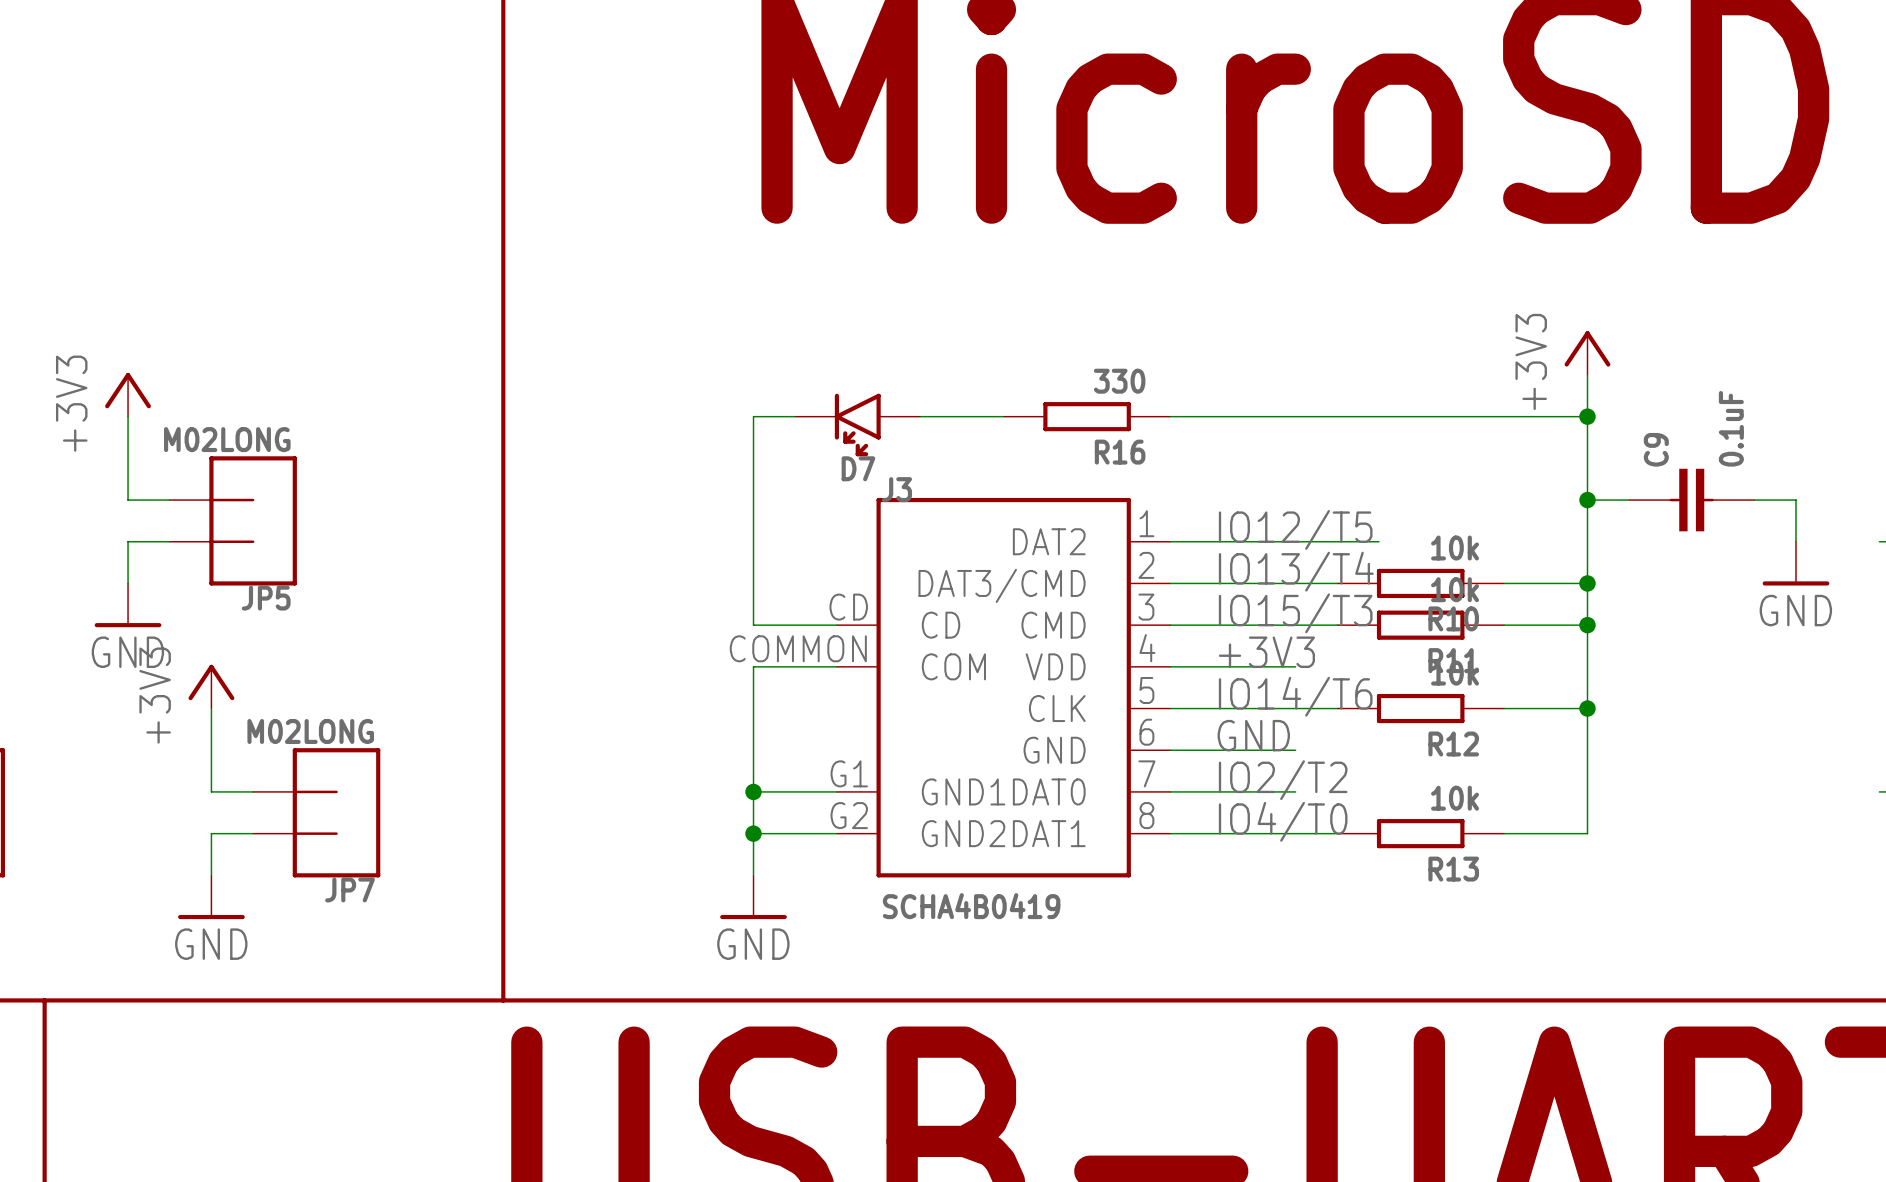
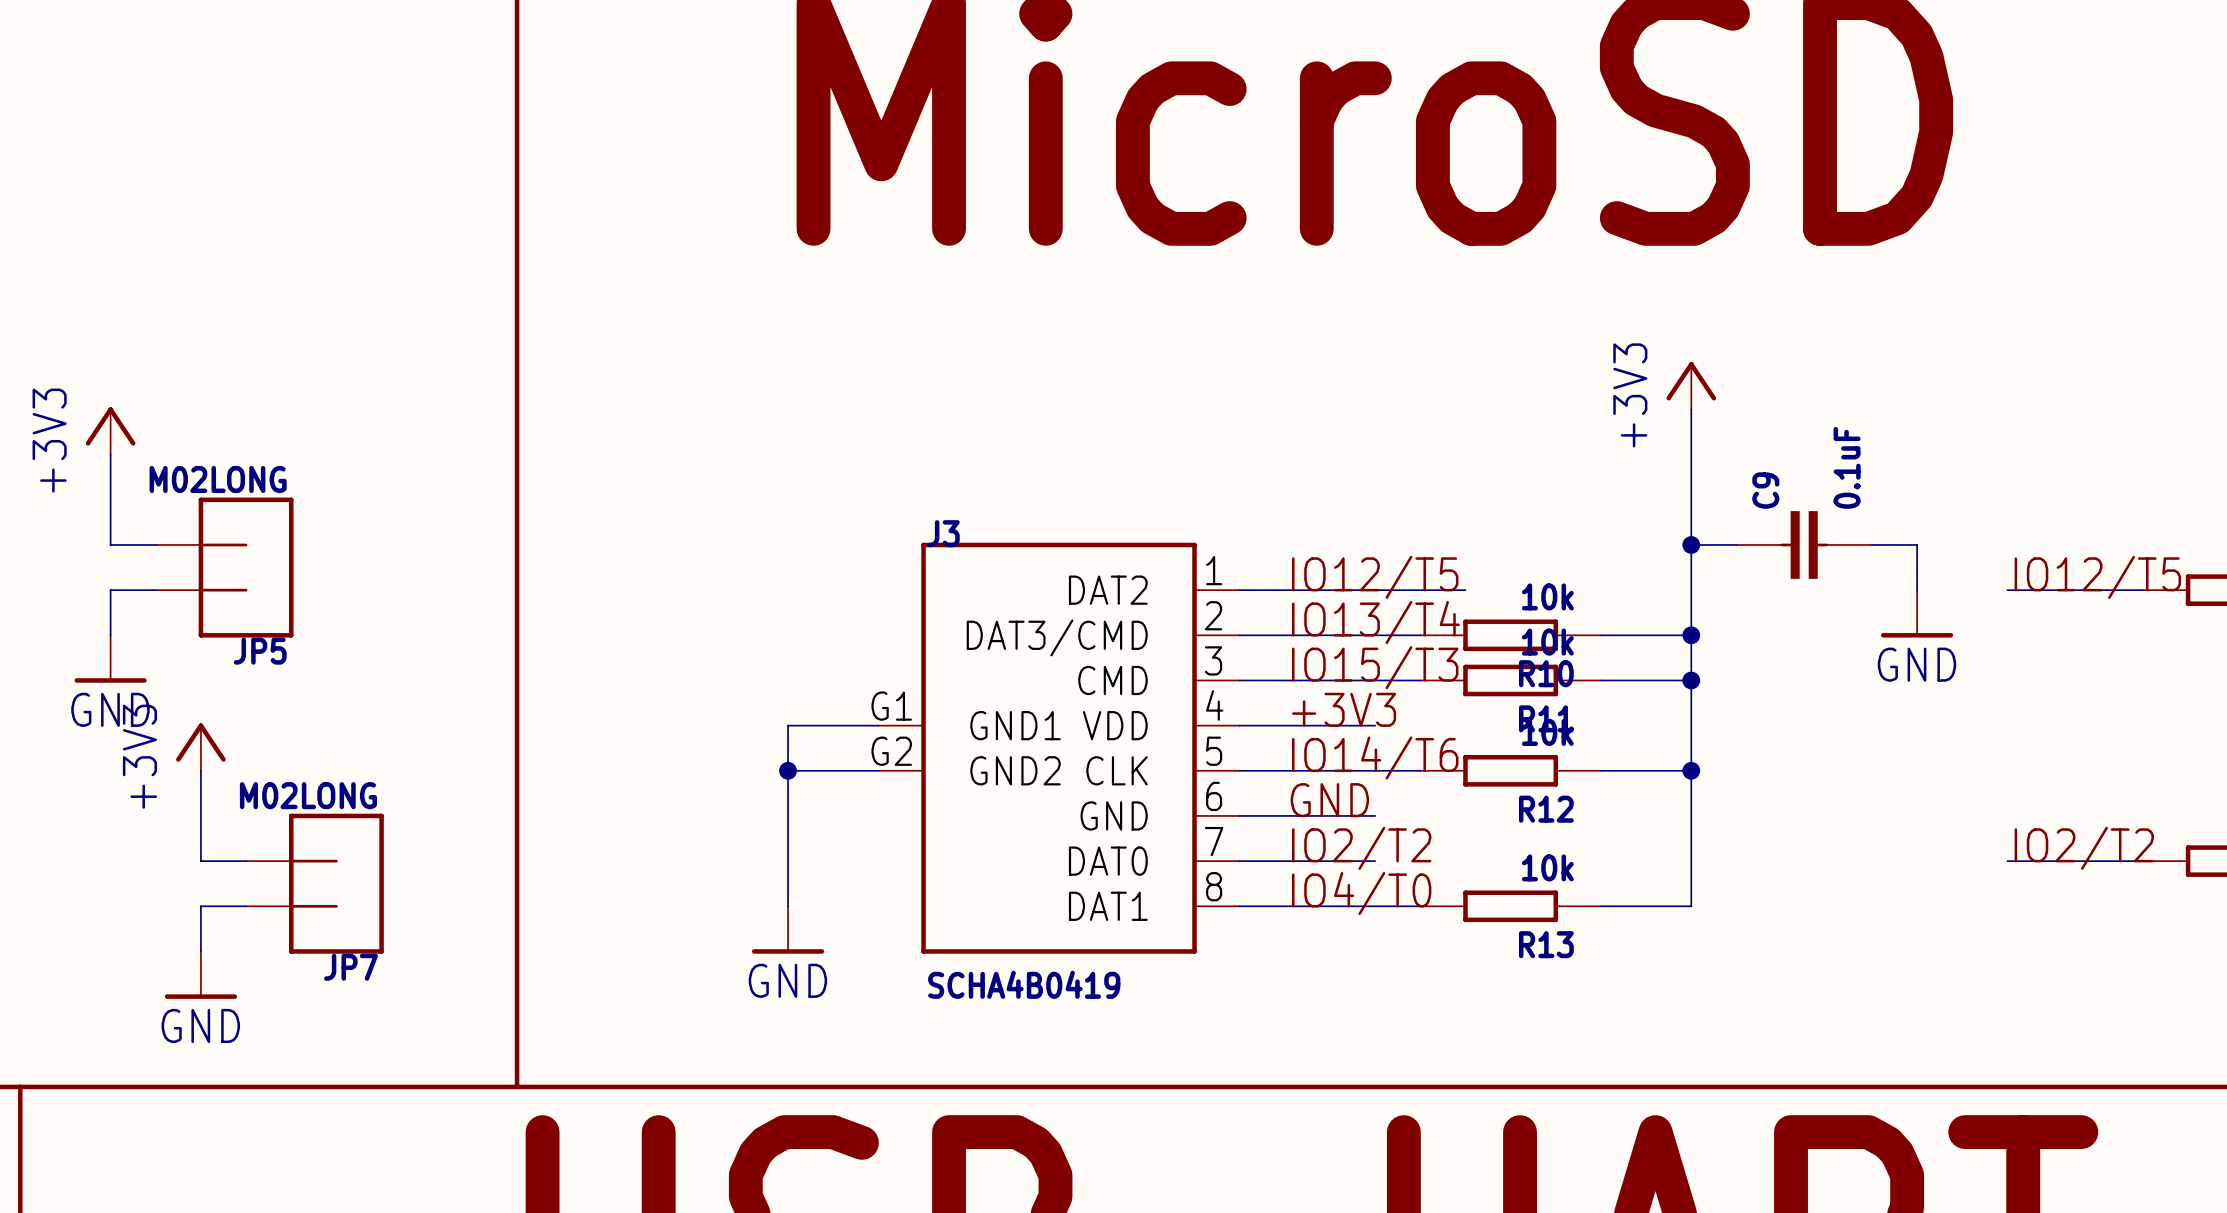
wire: (795, 416) (753, 416) (753, 625) (836, 625) -> none
wire: (920, 416) (1003, 416) -> none
R16: 330 (1087, 416) -> none
wire: (1170, 416) (1587, 416) -> none
junction: (1587, 416) -> none
D7: (857, 424) -> none
J3 symbol: [836, 497, 1171, 878] -> [878, 542, 1240, 954]
junction: none -> (788, 770)
wire: (753, 791) (836, 791) -> (788, 770) (878, 770)
junction: (753, 791) -> none
junction: (753, 833) -> none
wire: (836, 833) (753, 833) (753, 875) -> none
power symbol position: GND (753, 897) -> GND (788, 930)

